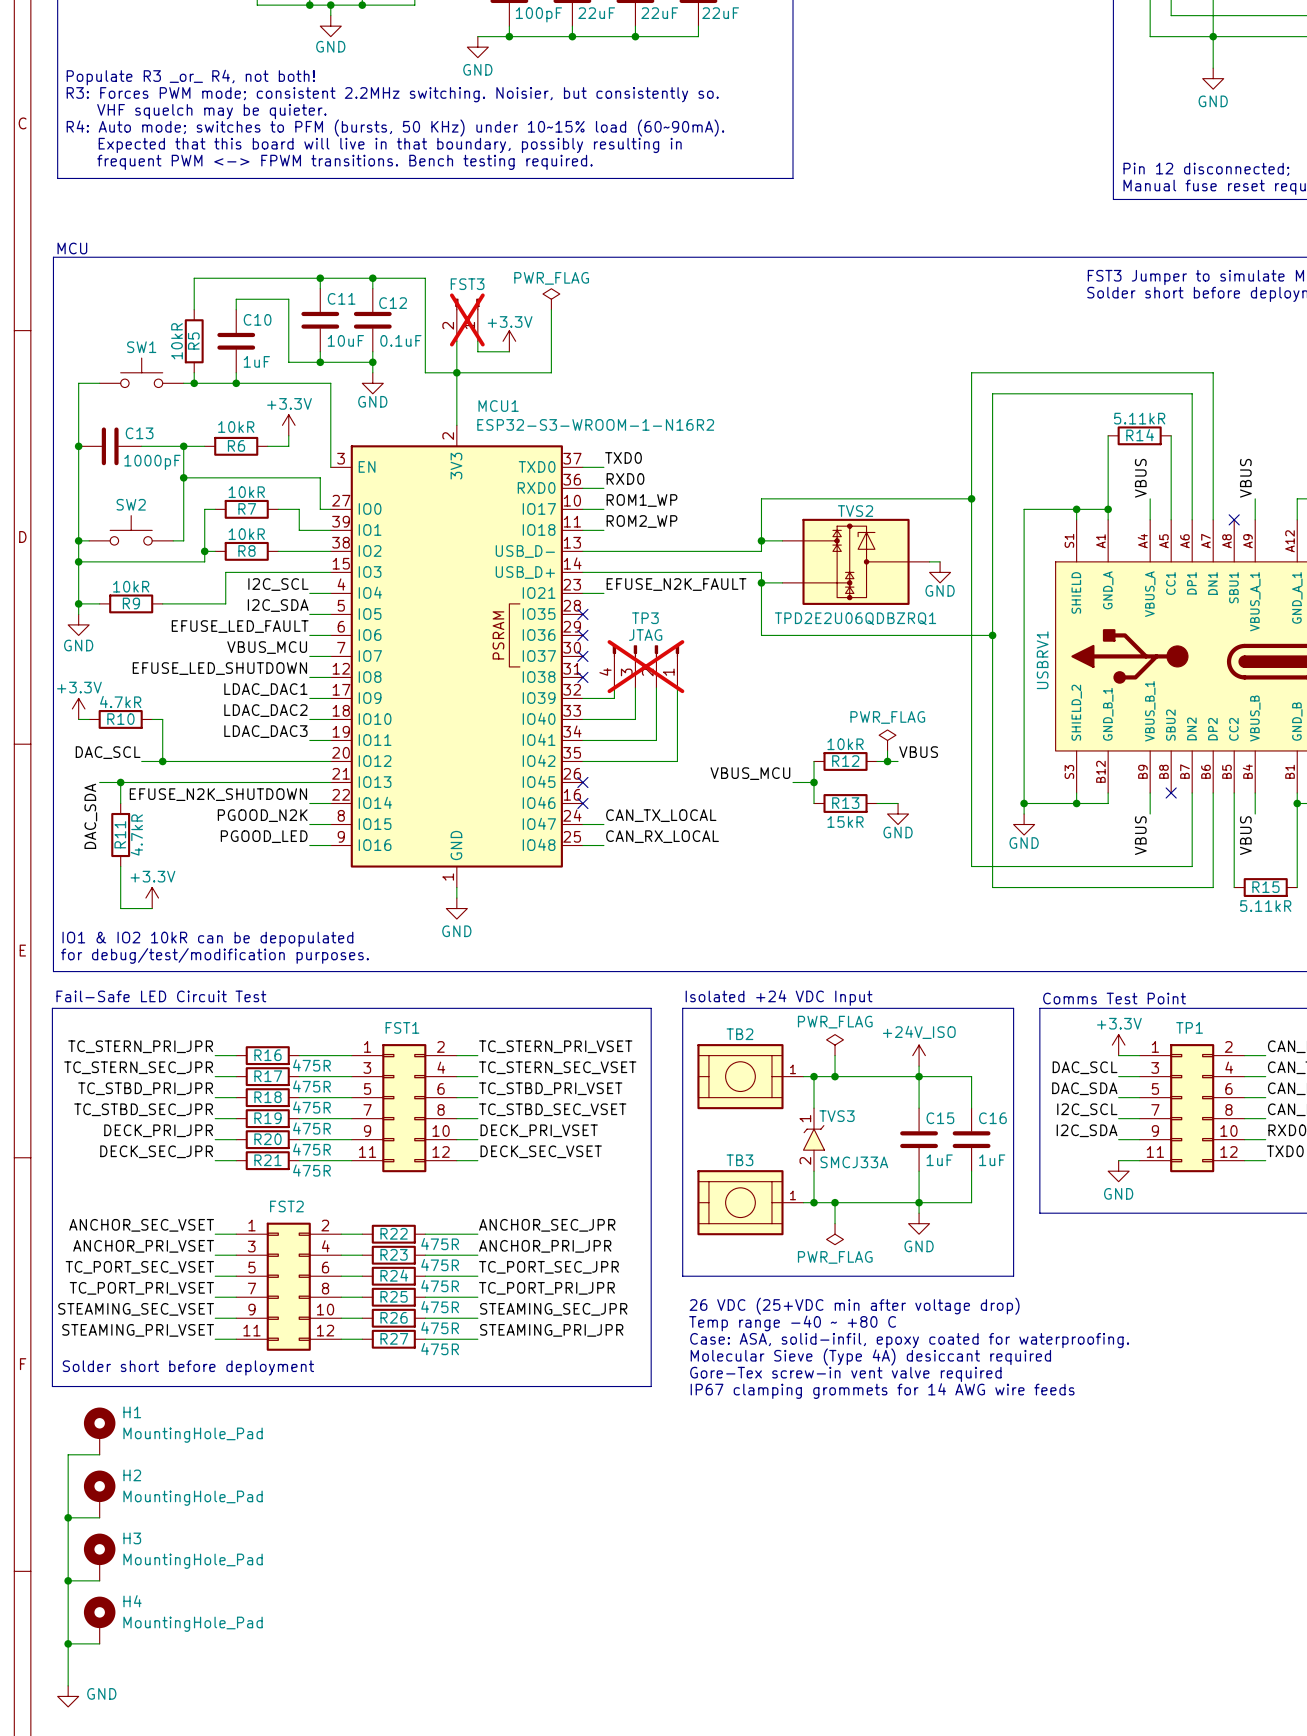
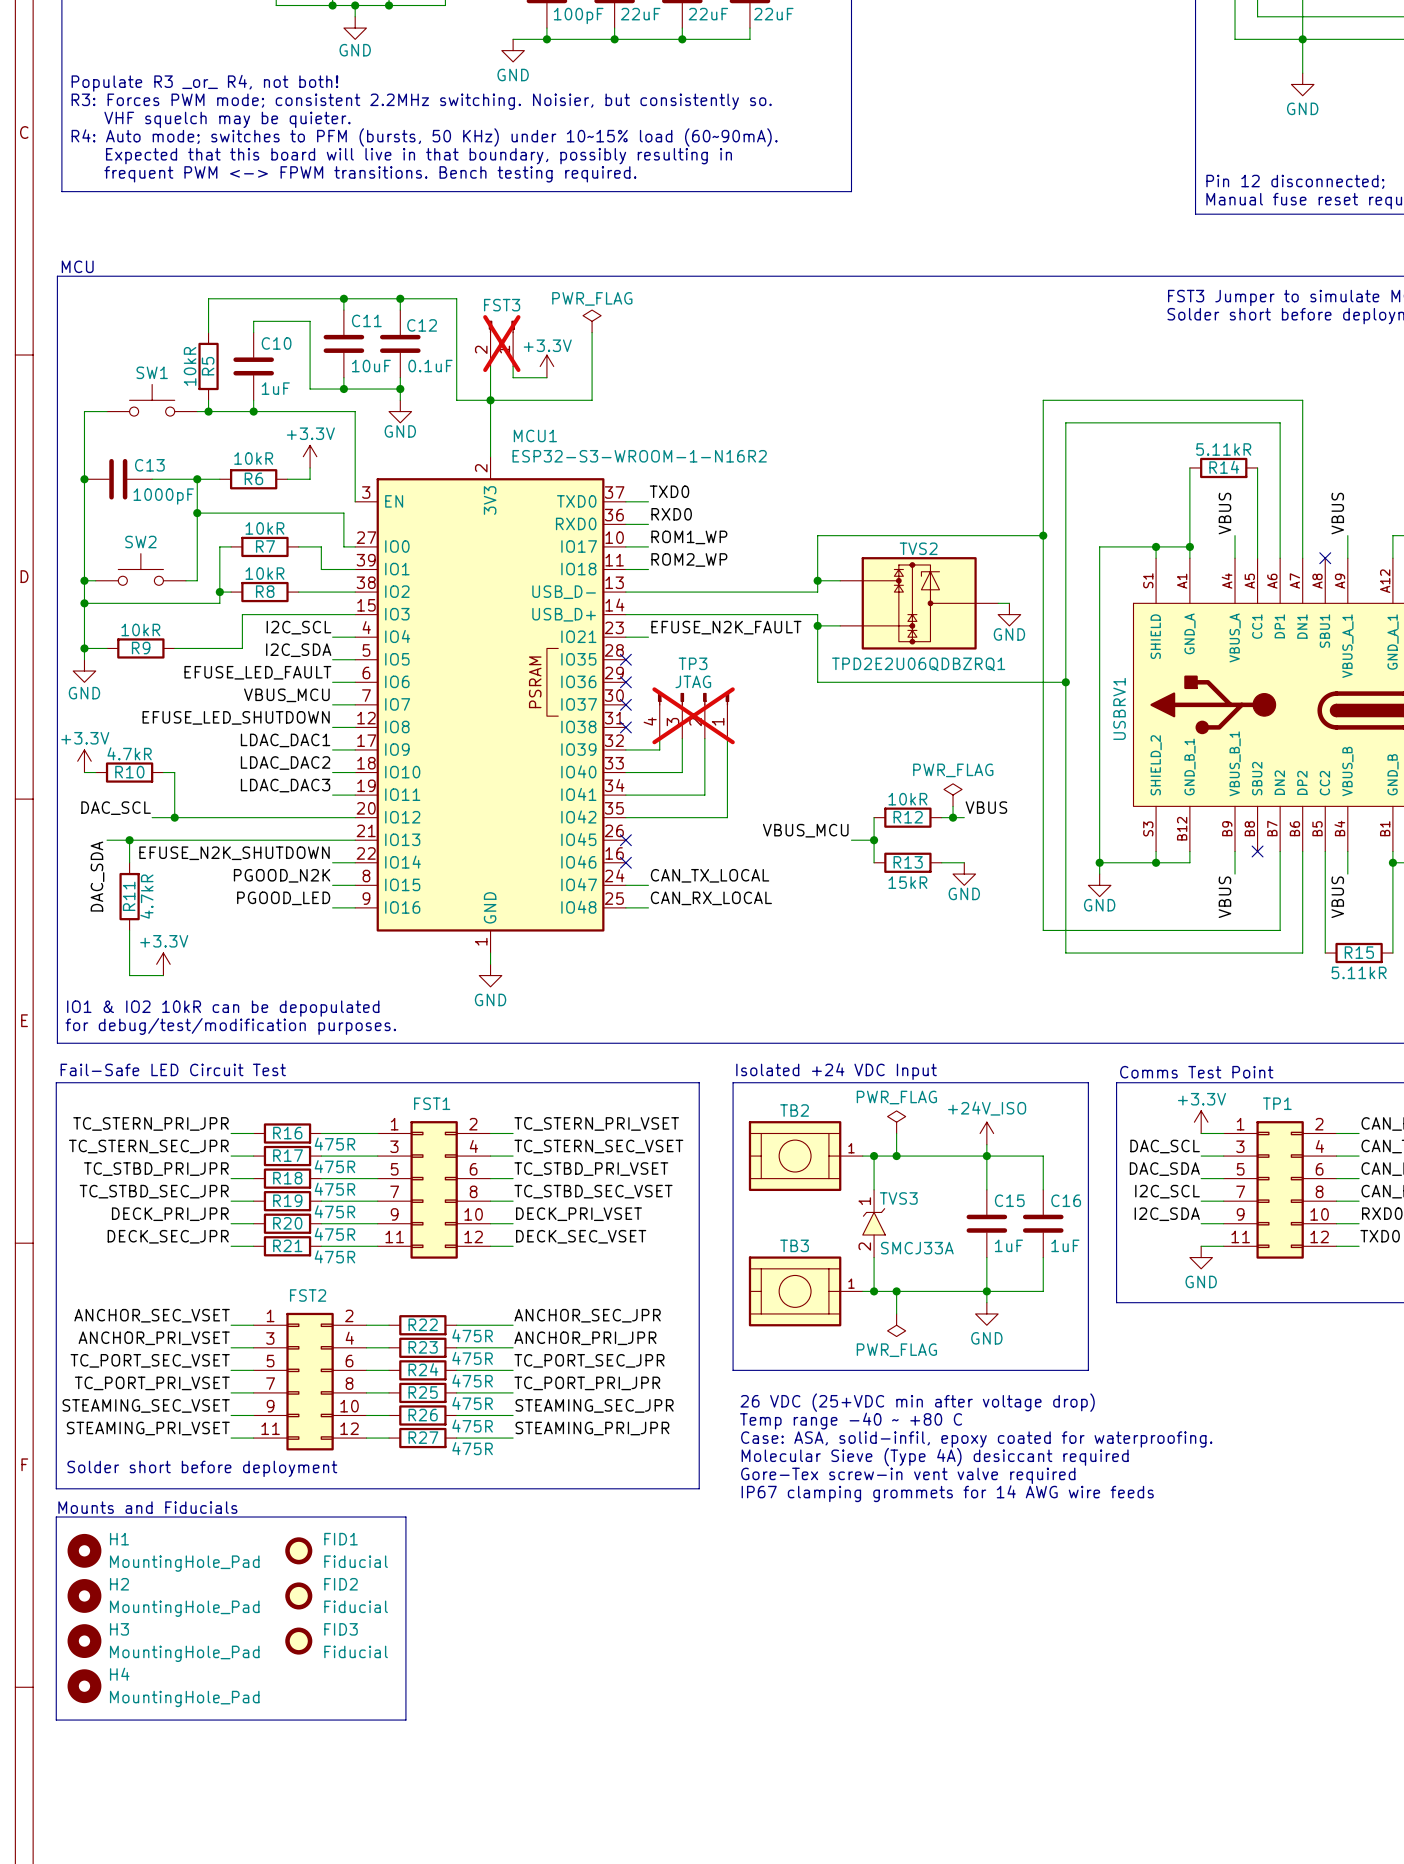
text: none -> Mounts and Fiducials (147, 1507)
H1 symbol: [83, 1407, 116, 1455] -> [67, 1533, 102, 1568]
line: none -> (56, 1517) (405, 1517) (405, 1720) (56, 1720) (56, 1517)
FID1: none -> Fiducial (298, 1550)
wire: (99, 1454) (68, 1454) (68, 1685) -> none
H2 symbol: [83, 1470, 116, 1518] -> [67, 1579, 102, 1613]
FID2: none -> Fiducial (298, 1595)
junction: (68, 1517) -> none
FID3: none -> Fiducial (298, 1641)
H3 symbol: [83, 1533, 116, 1581] -> [67, 1624, 102, 1659]
junction: (68, 1580) -> none
H4 symbol: [83, 1596, 116, 1644] -> [67, 1669, 102, 1704]
wire: (68, 1643) (99, 1643) -> none
junction: (68, 1643) -> none
power symbol: GND (68, 1696) -> none

